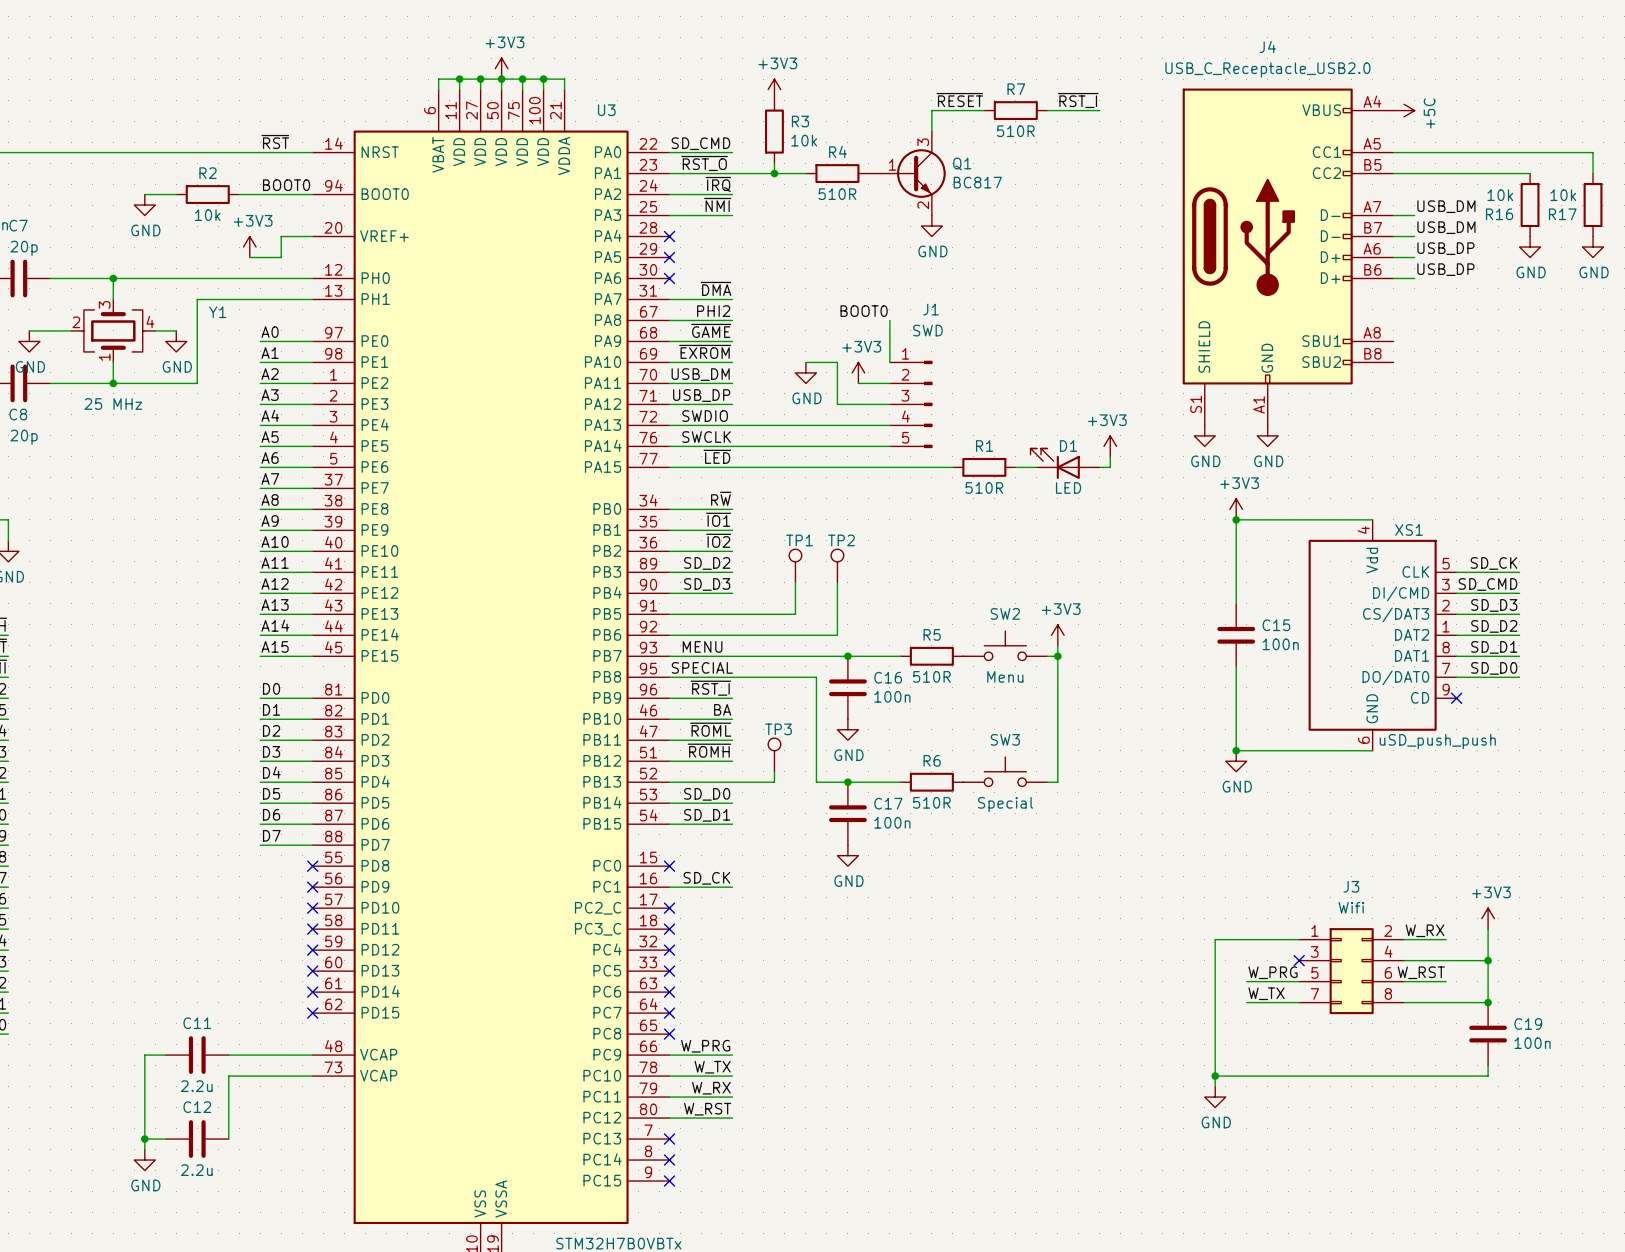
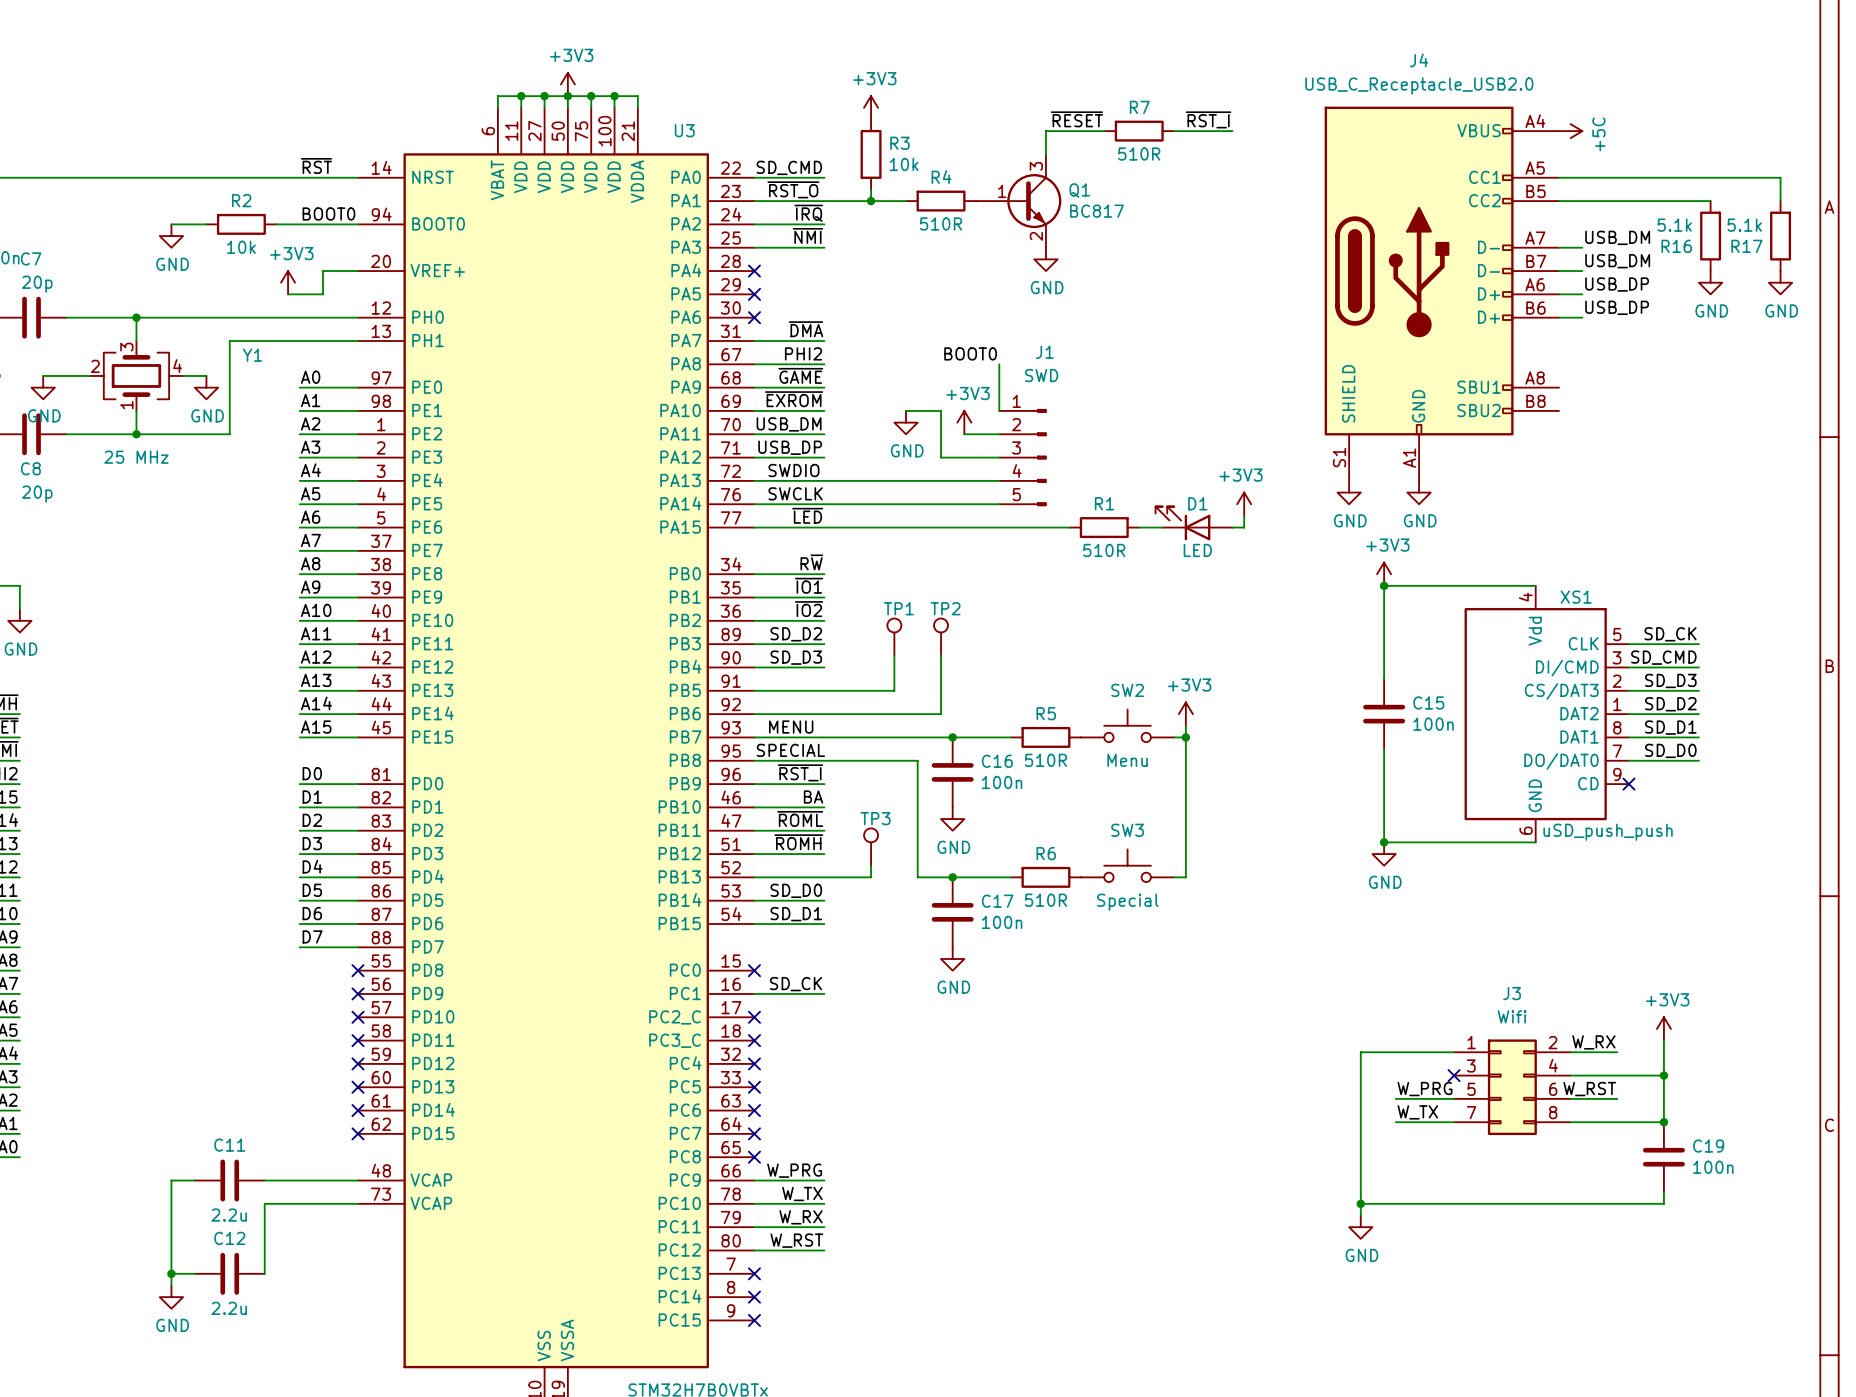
R16 value: 10k (1500, 195) -> 5.1k (1674, 225)
R17 value: 10k (1563, 195) -> 5.1k (1744, 225)

